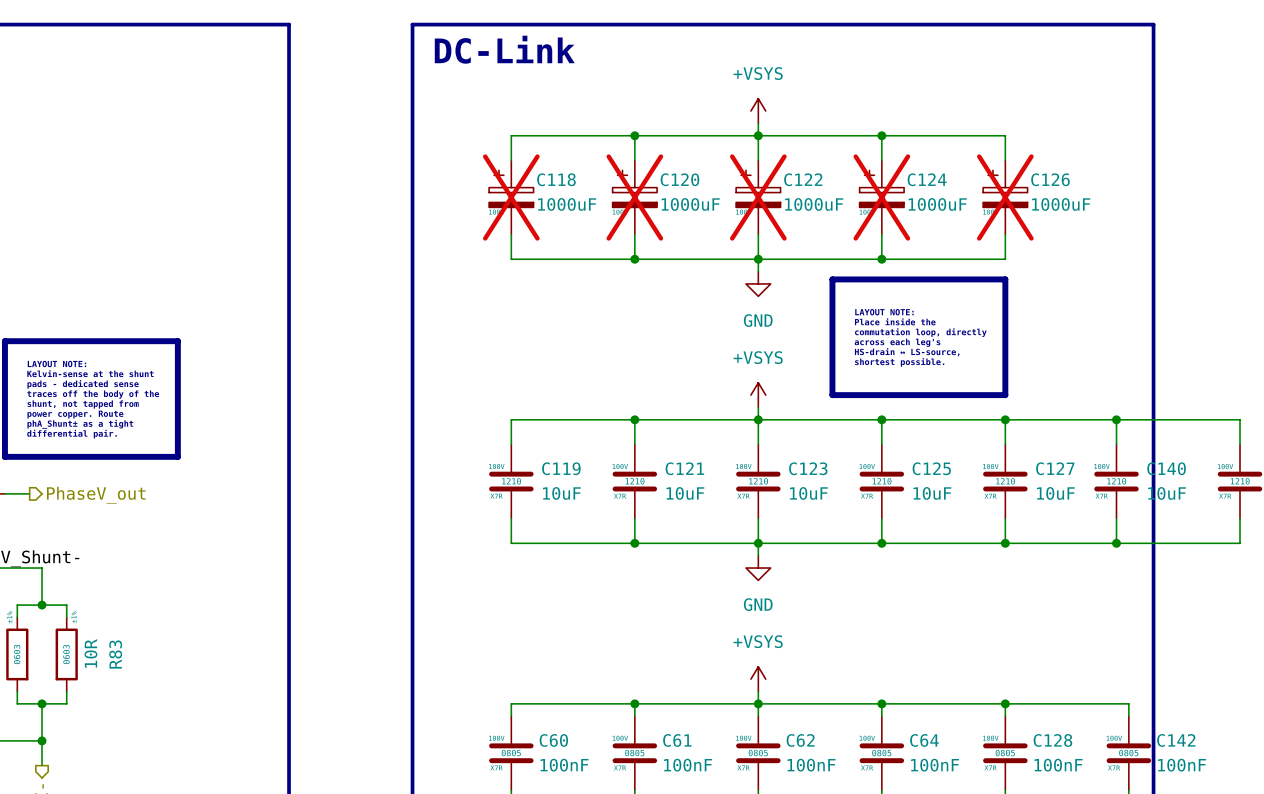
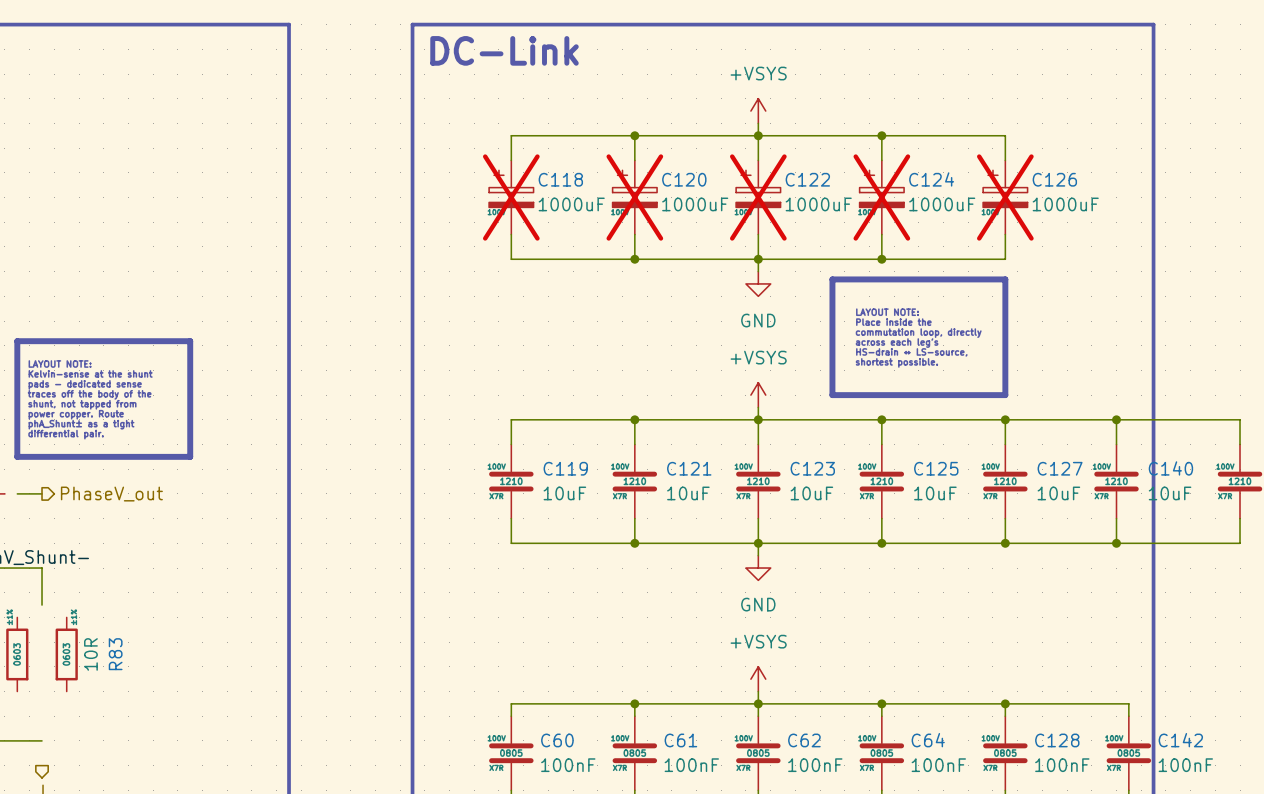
line: (17, 341) (4, 341) (4, 456) (17, 456) -> (17, 341) (17, 456)
line: (177, 341) (177, 456) -> (177, 341) (190, 341) (190, 456) (177, 456)
wire: (4, 493) (17, 493) -> (29, 493) (42, 493)
hierarchical label position: PhaseV_out (96, 495) -> PhaseV_out (111, 494)
junction: (42, 605) -> none
wire: (17, 617) (17, 605) (66, 605) (66, 617) -> none
wire: (17, 691) (17, 703) (66, 703) (66, 691) -> none
wire: (42, 703) (42, 765) -> none
junction: (42, 703) -> none
junction: (42, 740) -> none

